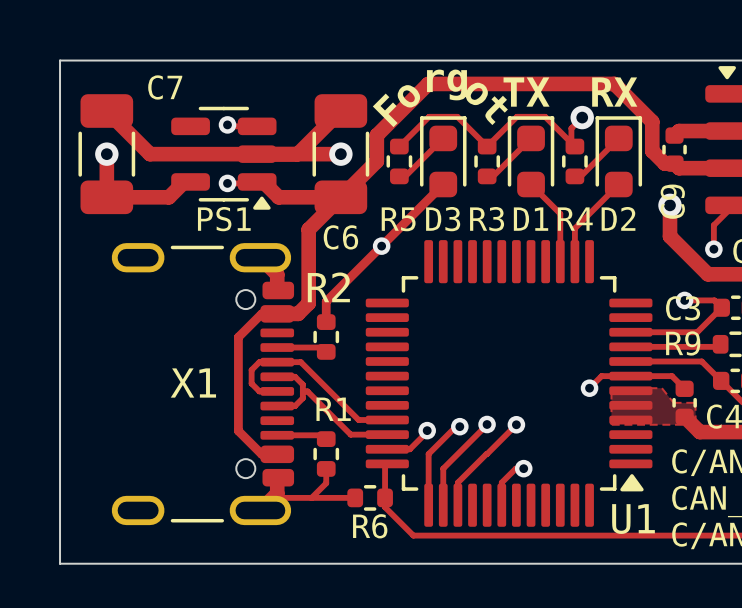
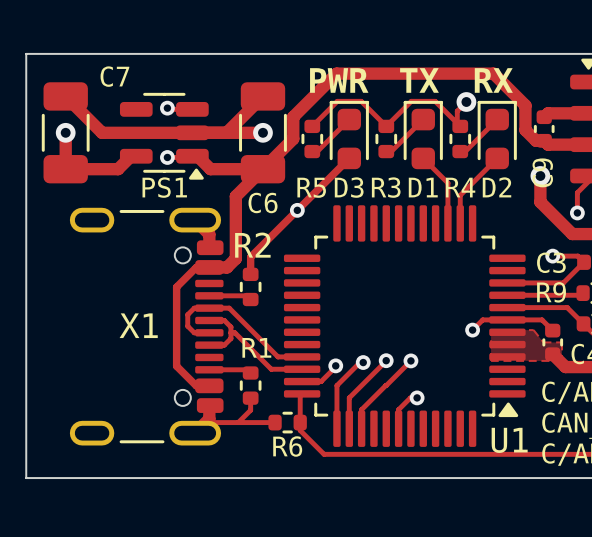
text: rg (446, 84) -> none
text: none -> PWR (339, 80)
text: ot (486, 103) -> none
text: Fo (396, 106) -> none

